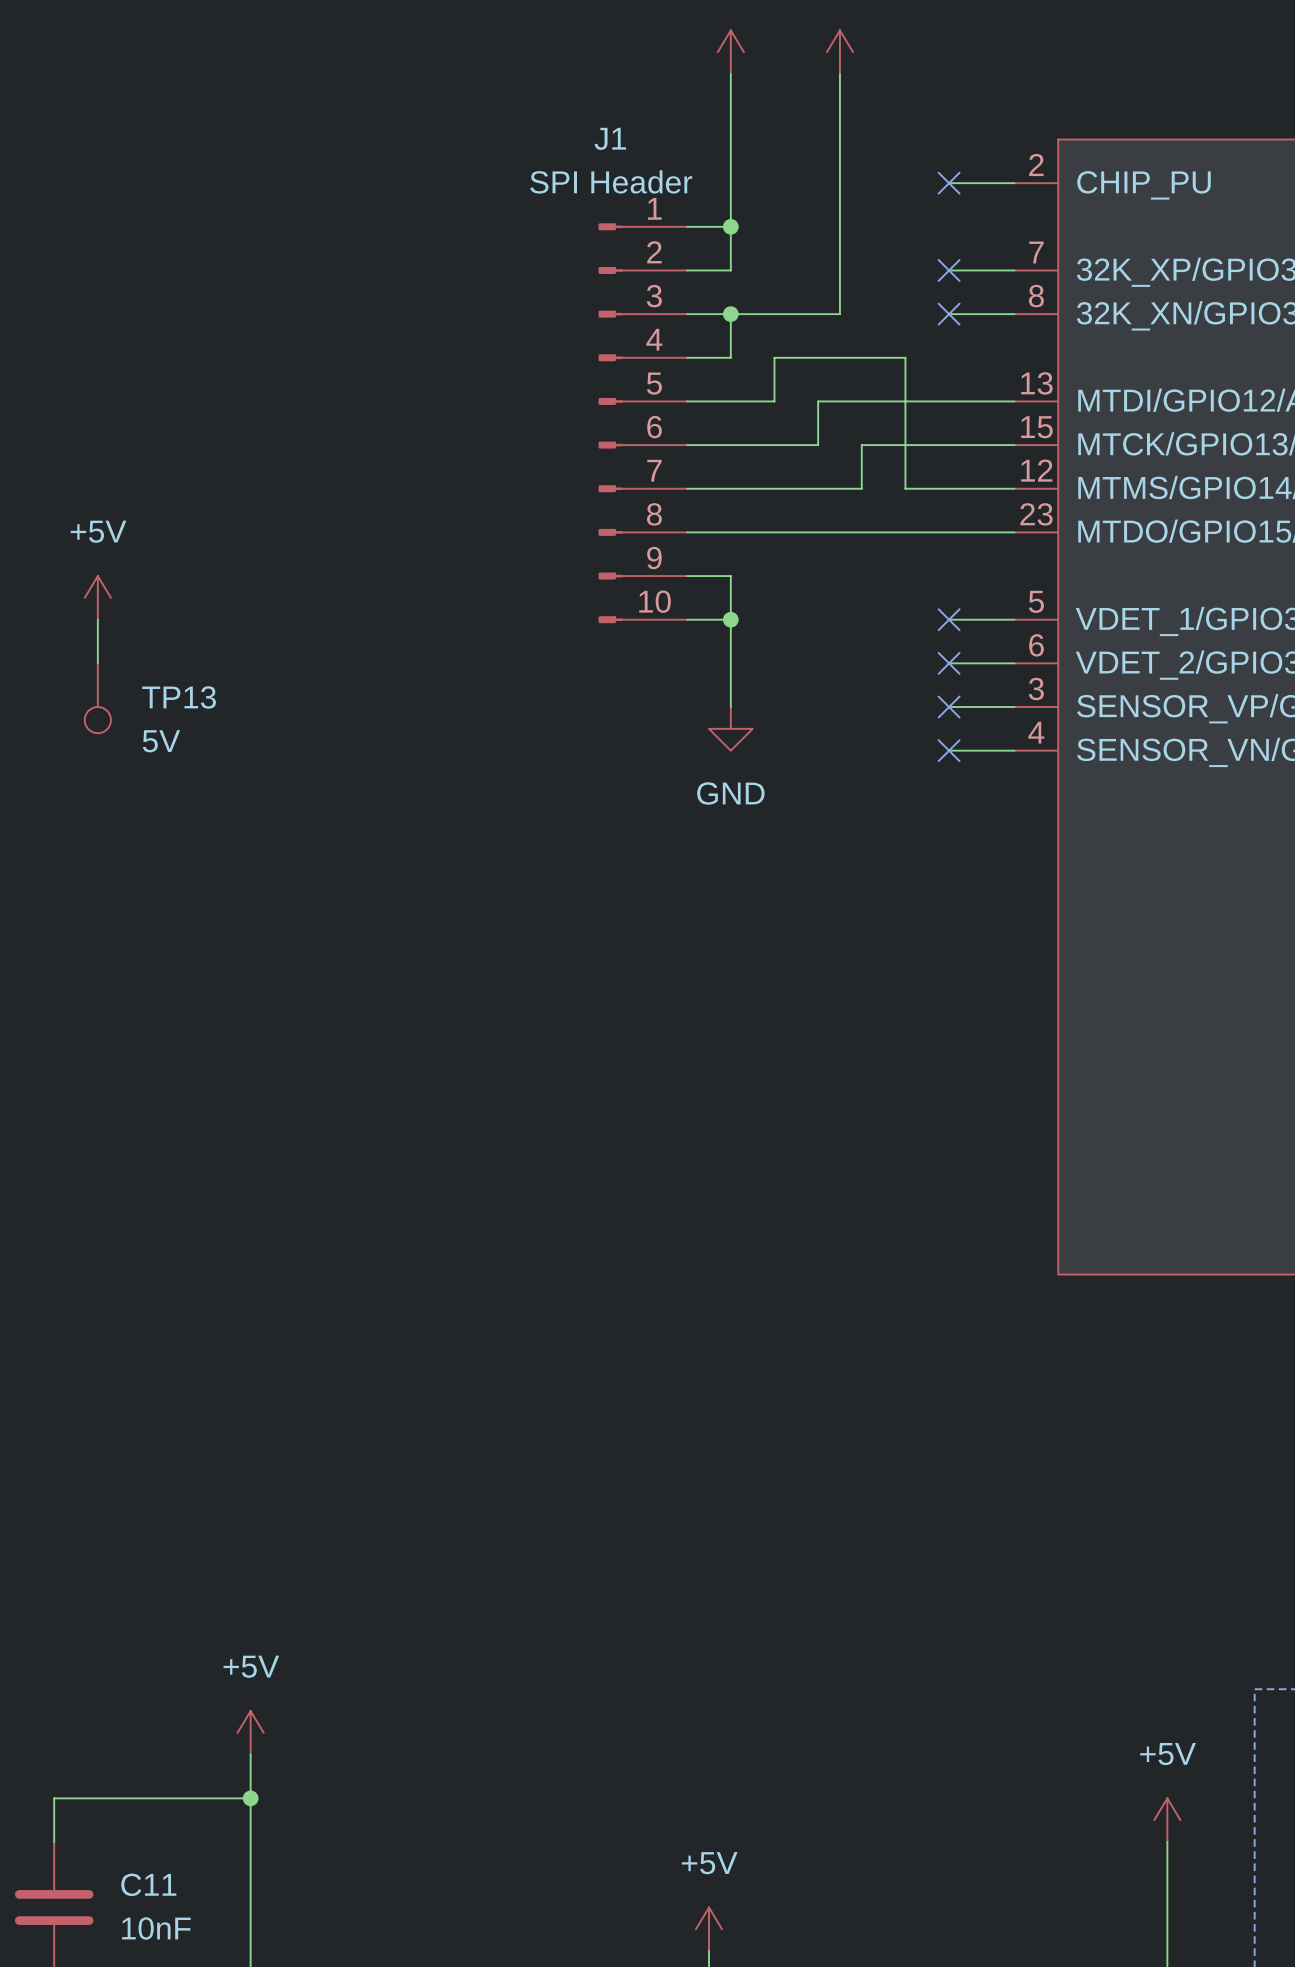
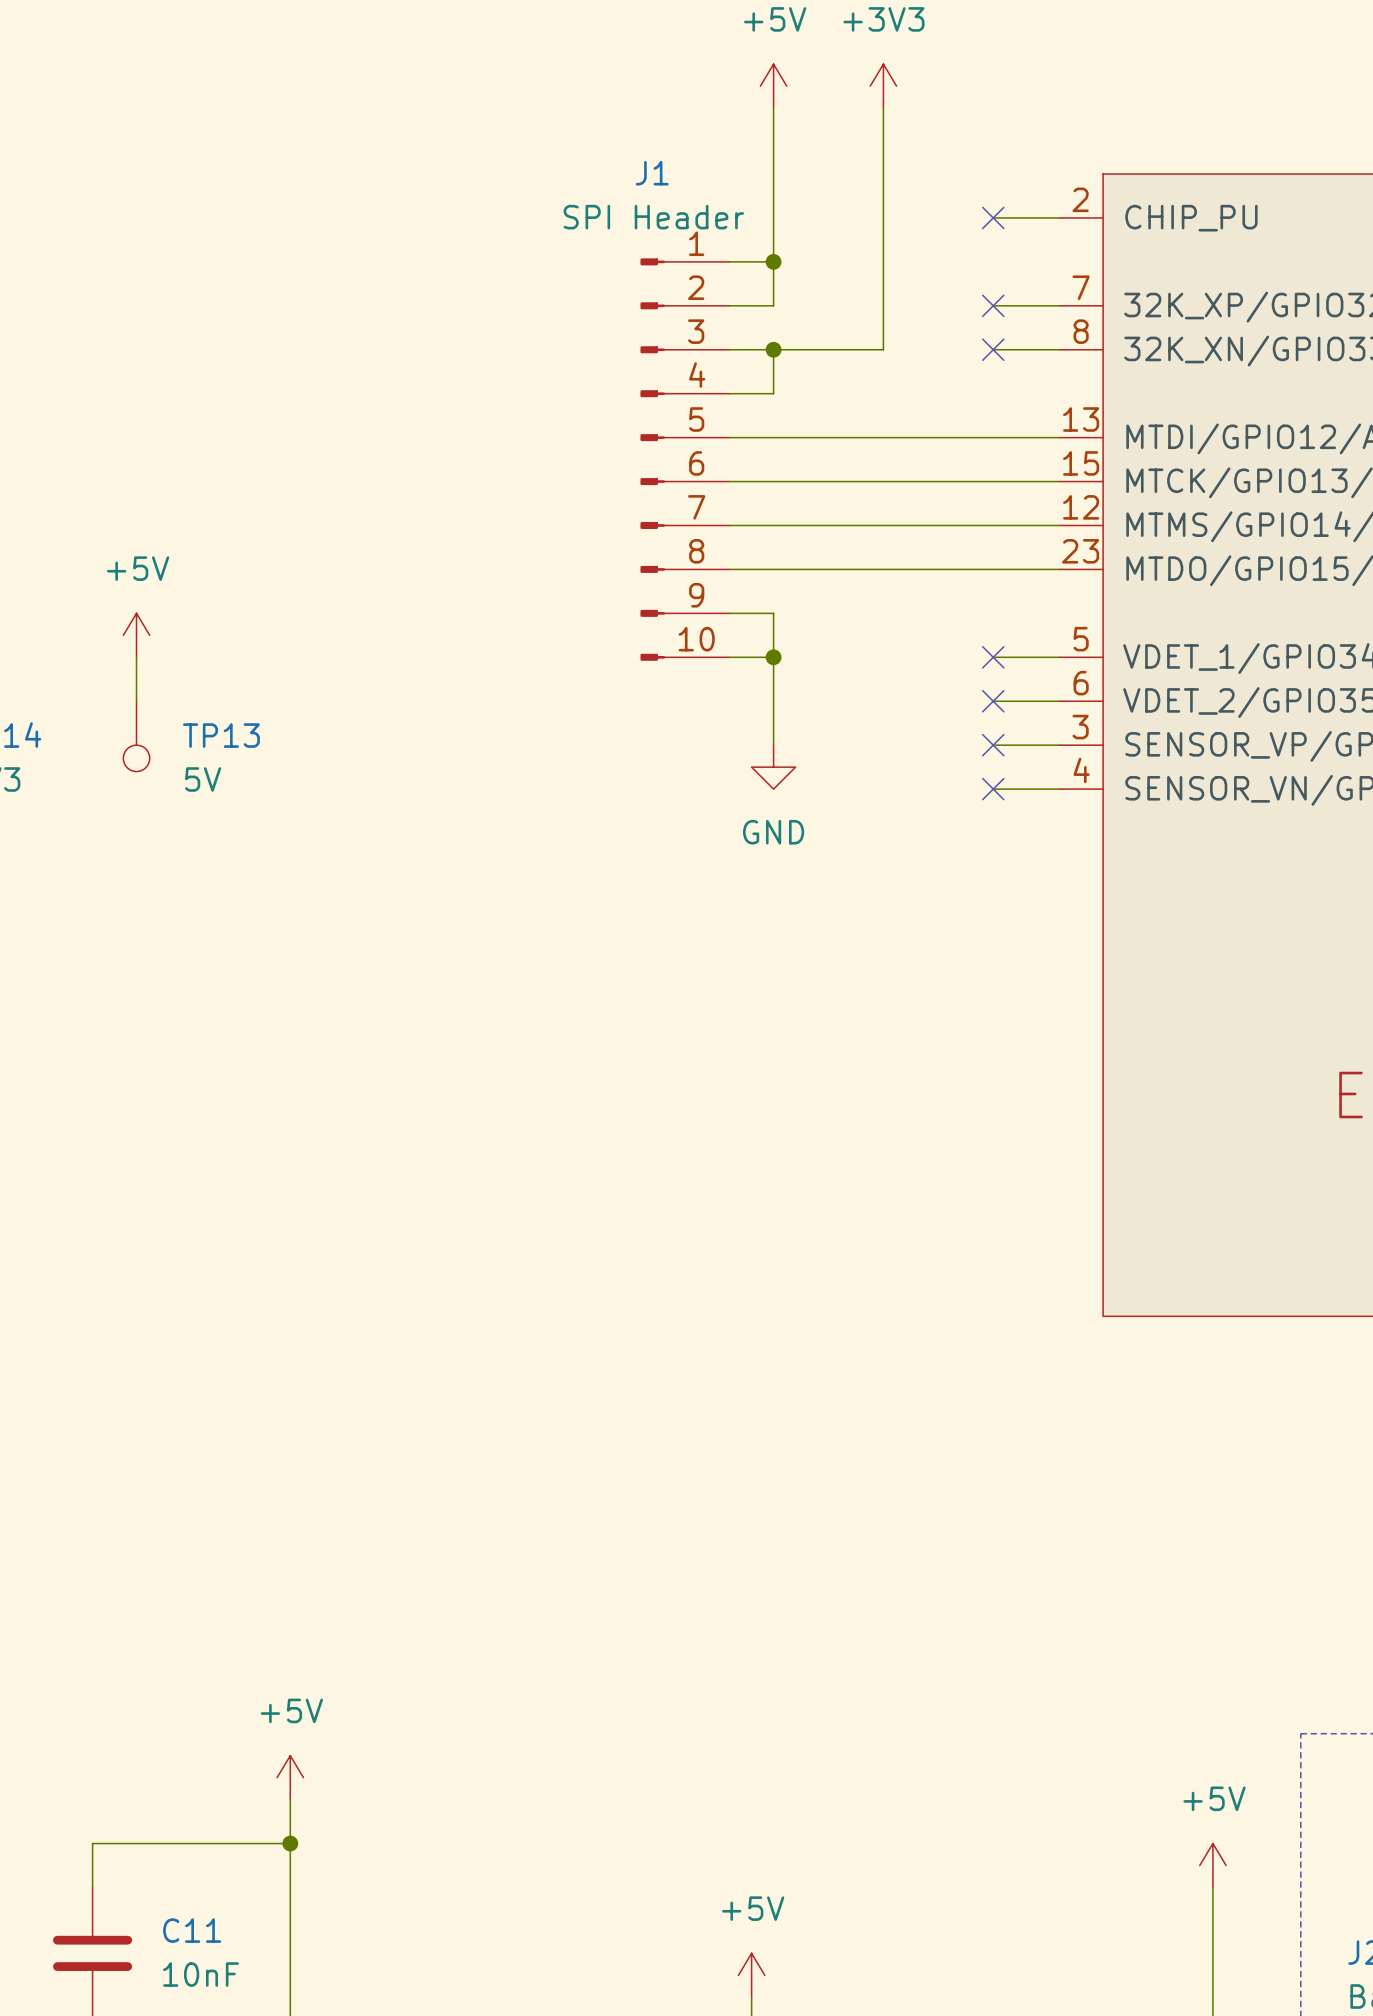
wire: (774, 401) (774, 357) (905, 357) (905, 488) -> none
wire: (818, 401) (818, 445) -> (861, 437) (817, 437)
wire: none -> (861, 481) (905, 481)
wire: (861, 445) (861, 488) -> (949, 525) (905, 525)

